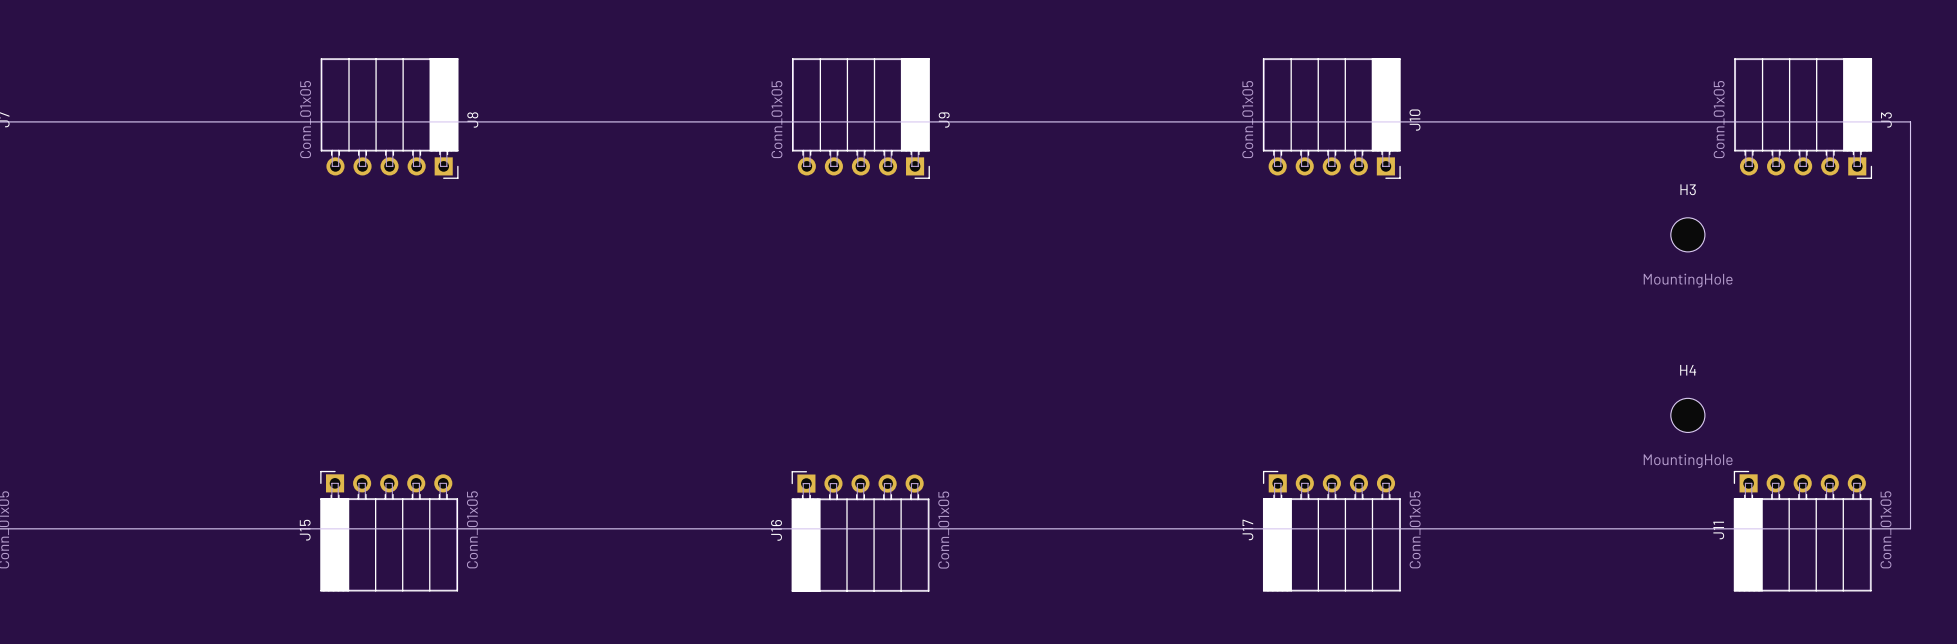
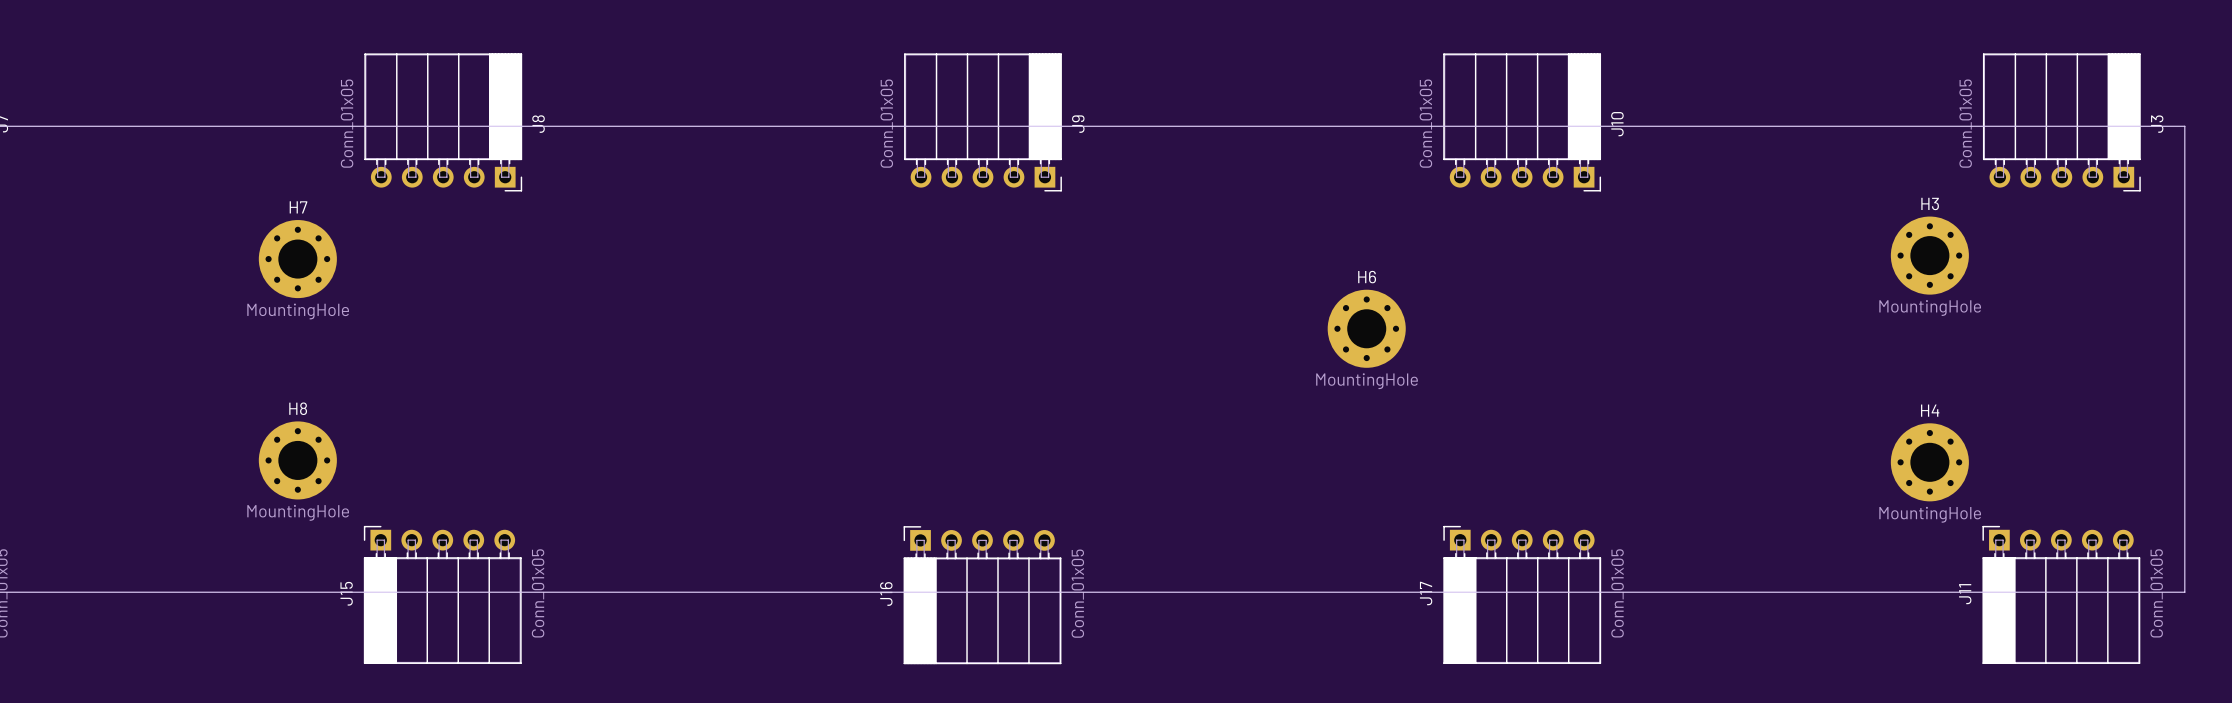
H3 footprint: [1670, 217, 1705, 252] -> [1890, 216, 1969, 295]
H7: none -> MountingHole (297, 259)
H6: none -> MountingHole (1366, 328)
H4 footprint: [1670, 398, 1705, 433] -> [1890, 423, 1969, 502]
H8: none -> MountingHole (297, 460)

